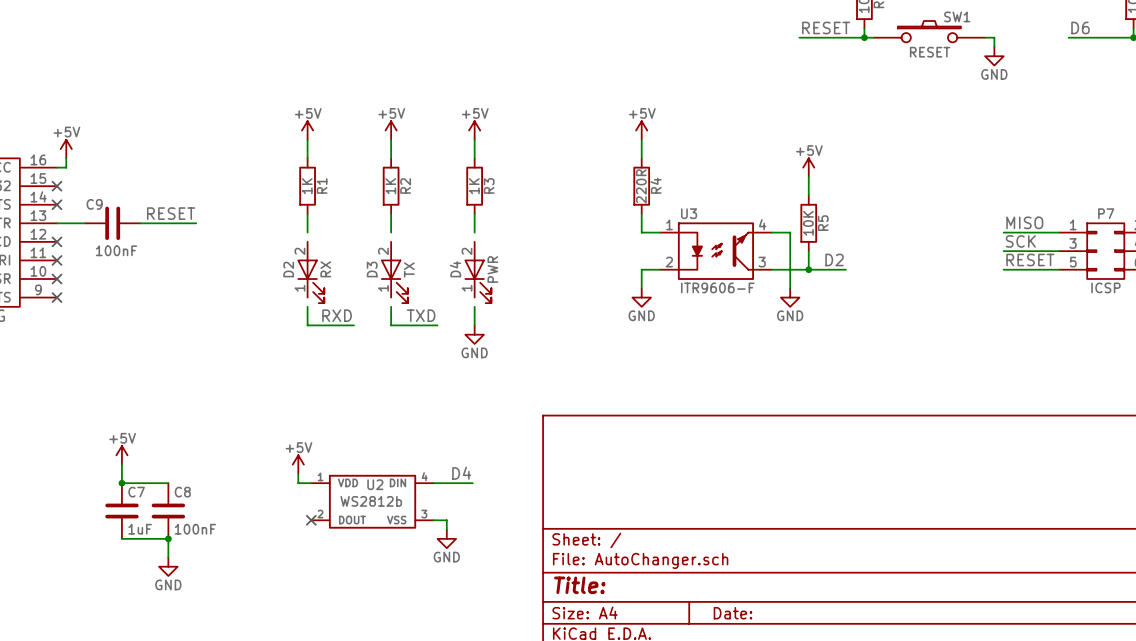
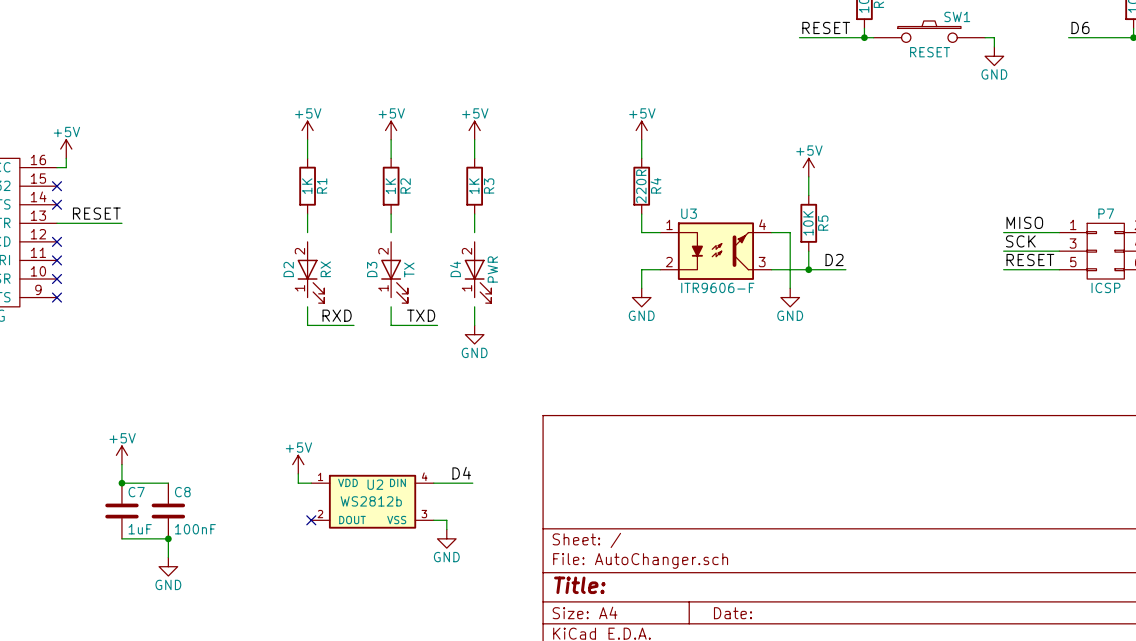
label position: RESET (171, 213) -> RESET (96, 213)
C9: 100nF (112, 223) -> none
wire: (140, 223) (196, 223) -> none

